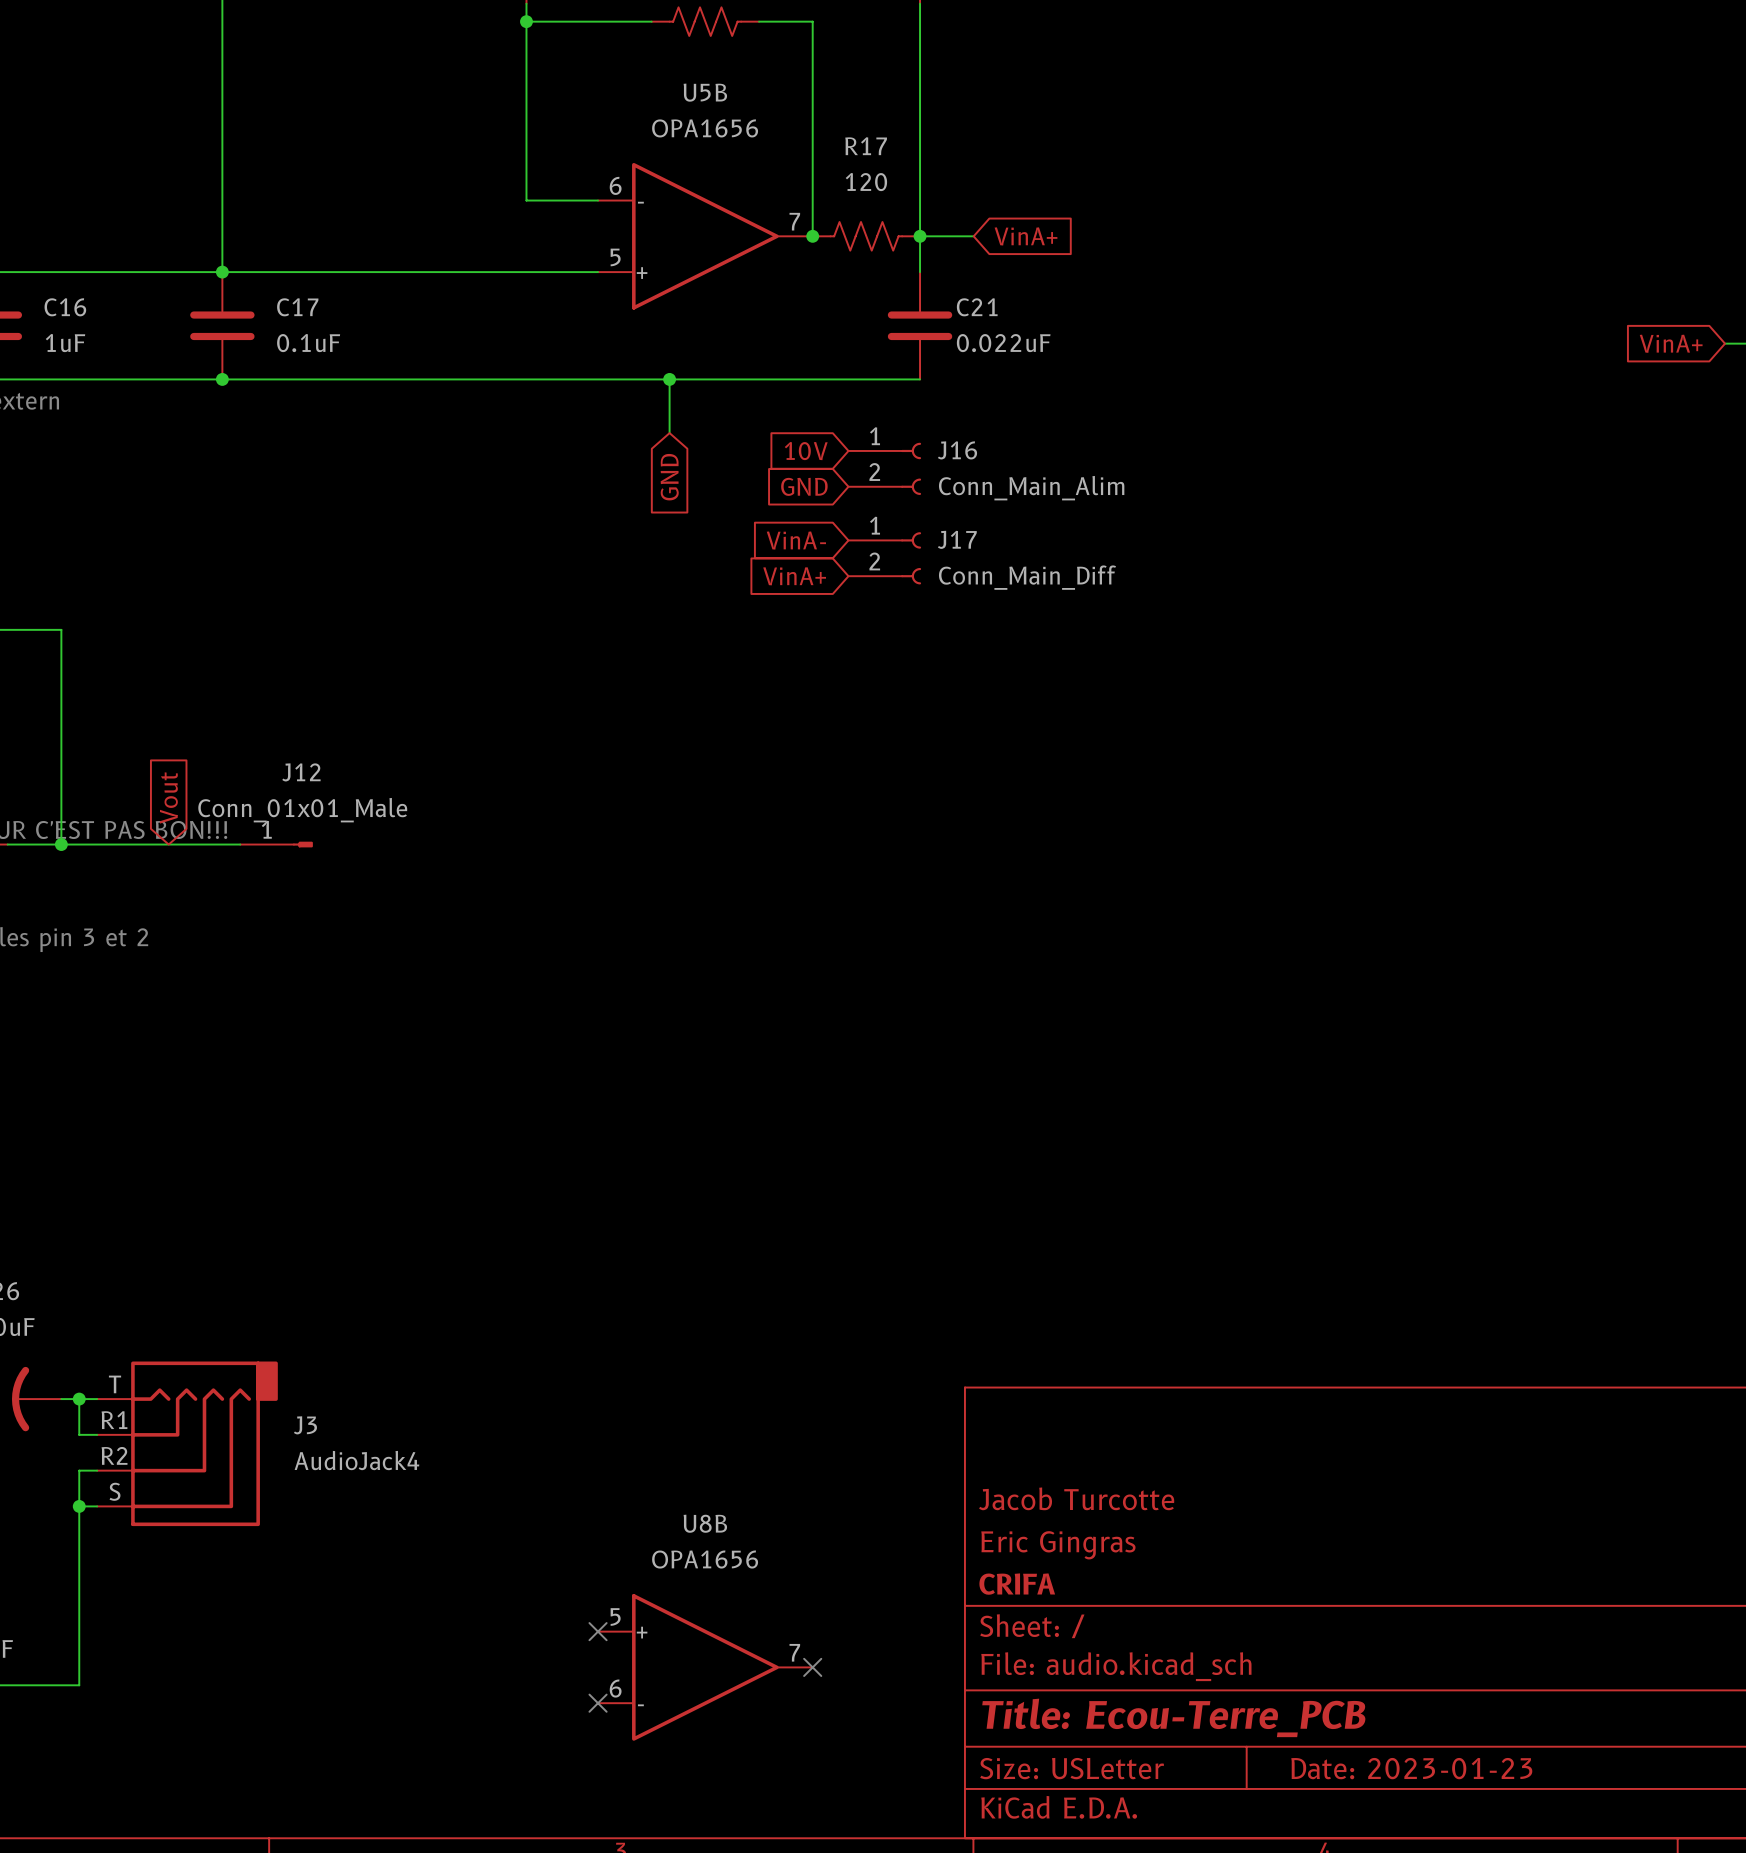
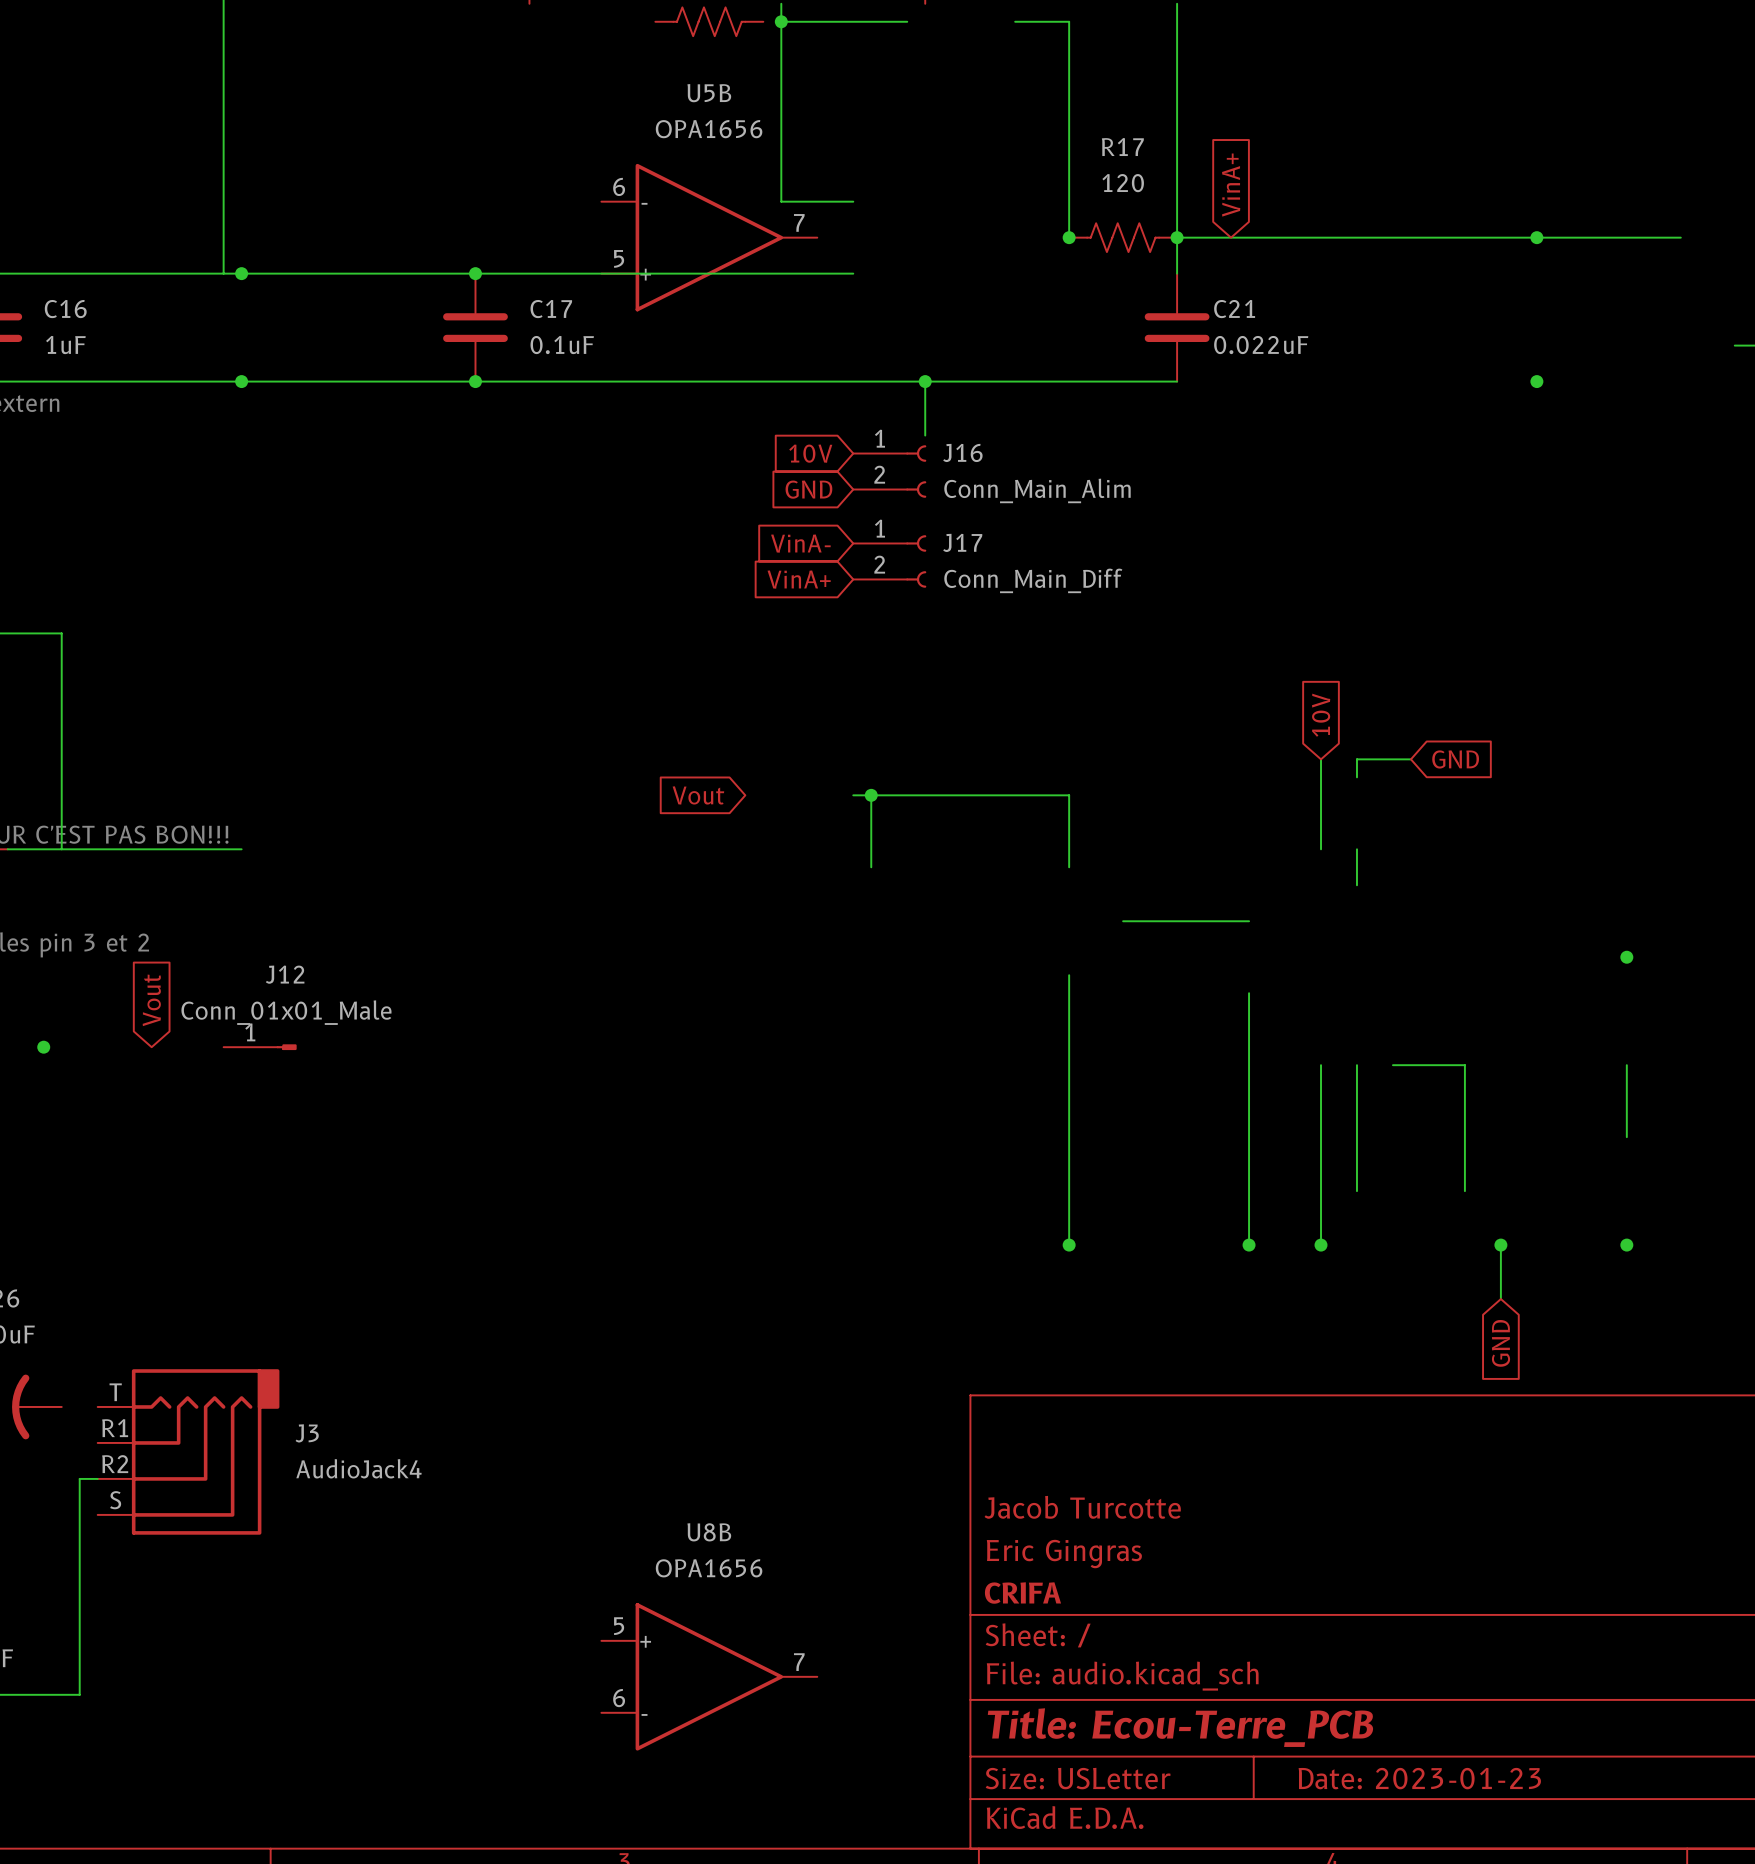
wire: (526, 3) (526, 200) (598, 200) -> (781, 3) (781, 201) (853, 201)
wire: (920, 3) (920, 272) -> (1177, 3) (1177, 273)
wire: (526, 21) (651, 21) -> none
junction: (526, 21) -> none
wire: (759, 21) (776, 21) -> none
junction: none -> (781, 21)
wire: (812, 21) (812, 236) -> (817, 21) (907, 21)
wire: none -> (1015, 21) (1069, 21) (1069, 237)
junction: (812, 236) -> none
R17 position: (866, 236) -> (1123, 237)
wire: (920, 236) (973, 236) -> none
junction: (920, 236) -> none
global label rotation: 0° (1025, 236) -> 90° counterclockwise (1231, 185)
global label position: VinA+ (1025, 236) -> VinA+ (1231, 185)
junction: none -> (1069, 237)
wire: none -> (1177, 237) (1680, 237)
junction: none -> (1177, 237)
junction: none -> (1536, 237)
junction position: (222, 272) -> (241, 273)
junction: none -> (475, 273)
wire: none -> (601, 273) (853, 273)
C17 position: (222, 325) -> (475, 327)
C21 position: (920, 325) -> (1177, 327)
global label: VinA+ (1671, 343) -> none
junction position: (222, 379) -> (241, 381)
junction: none -> (475, 381)
wire: (669, 379) (669, 433) -> none
junction: (669, 379) -> none
junction: none -> (925, 381)
wire: none -> (1177, 381) (925, 381) (925, 435)
junction: none -> (1536, 381)
global label: GND (669, 477) -> none
global label: none -> 10V (1321, 715)
wire: none -> (1321, 759) (1321, 849)
wire: none -> (1410, 759) (1356, 759) (1356, 777)
global label: none -> GND (1455, 759)
global label: none -> Vout (698, 795)
wire: none -> (853, 795) (1069, 795) (1069, 867)
wire: none -> (871, 795) (871, 867)
junction: none -> (871, 795)
global label position: Vout (168, 797) -> Vout (151, 1000)
junction: (61, 844) -> none
J12 position: (276, 844) -> (260, 1047)
wire: none -> (1356, 849) (1356, 885)
wire: none -> (1123, 921) (1249, 921)
junction: none -> (1626, 957)
wire: none -> (1069, 975) (1069, 1245)
wire: none -> (1249, 993) (1249, 1245)
junction: none -> (43, 1047)
wire: none -> (1321, 1065) (1321, 1245)
wire: none -> (1356, 1065) (1356, 1191)
wire: none -> (1392, 1065) (1464, 1065) (1464, 1191)
wire: none -> (1626, 1065) (1626, 1137)
junction: none -> (1069, 1245)
junction: none -> (1249, 1245)
junction: none -> (1321, 1245)
wire: none -> (1500, 1245) (1500, 1299)
junction: none -> (1500, 1245)
junction: none -> (1626, 1245)
global label: none -> GND (1501, 1343)
wire: (61, 1399) (97, 1399) -> none
wire: (79, 1399) (79, 1434) (97, 1434) -> none
junction: (79, 1399) -> none
wire: (79, 1506) (97, 1506) -> none
junction: (79, 1506) -> none
no-connect mark: (598, 1631) -> none
no-connect mark: (812, 1667) -> none
no-connect mark: (598, 1703) -> none

